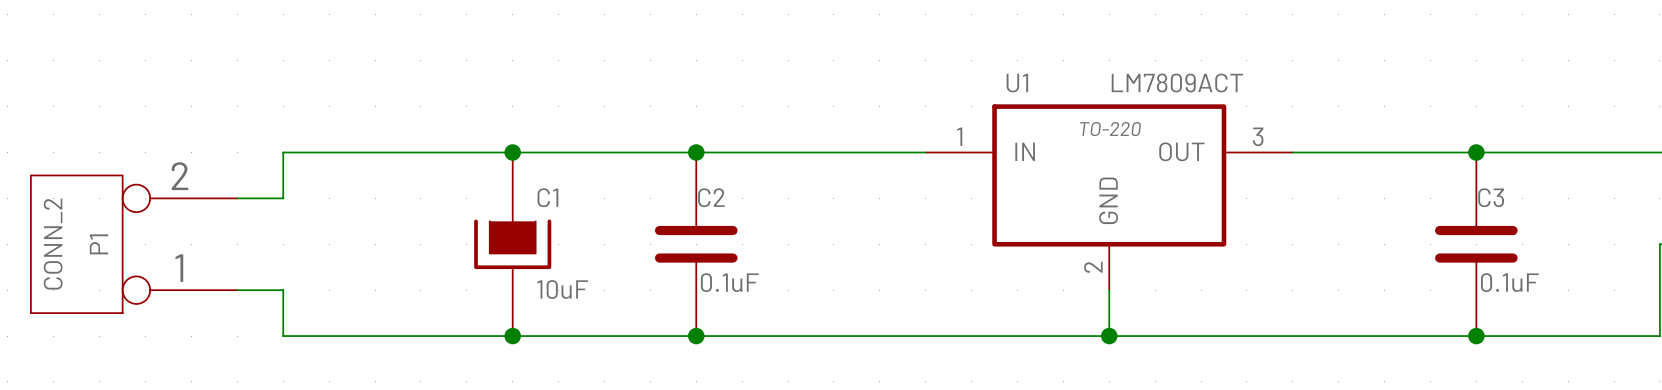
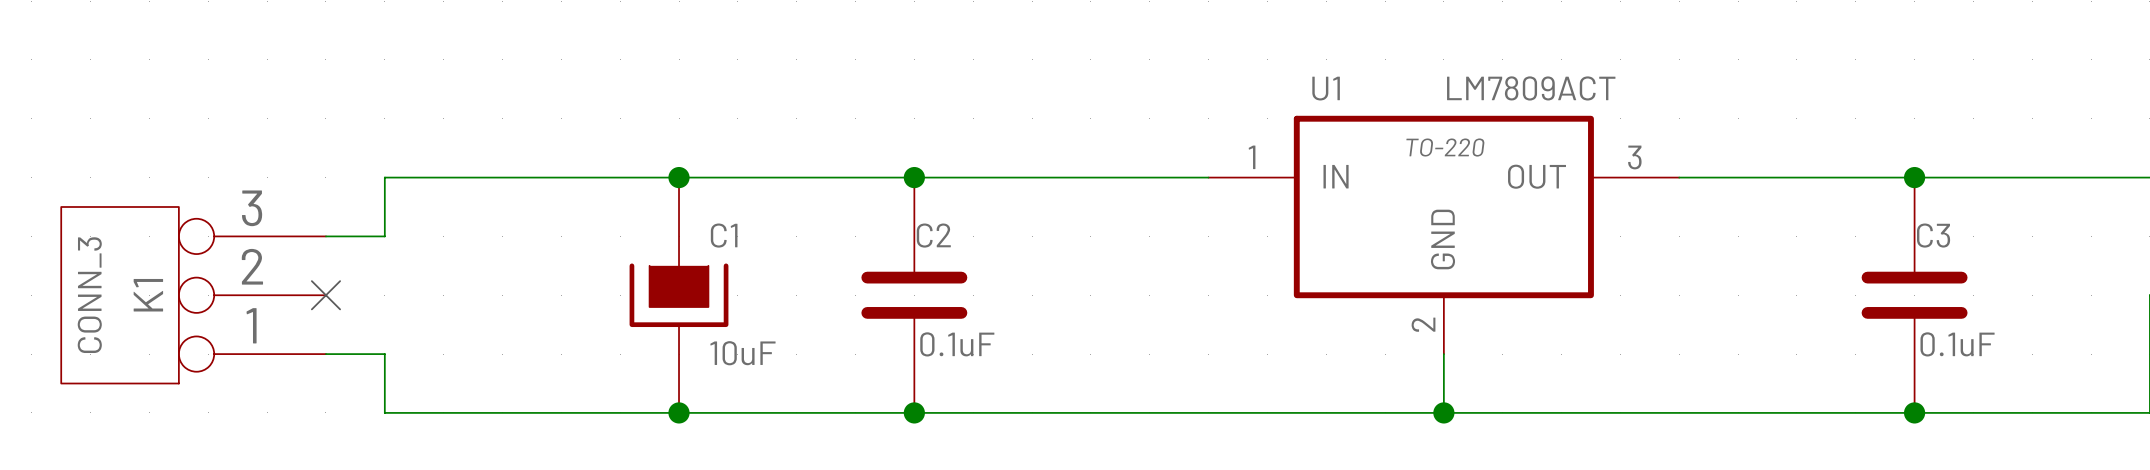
P1: CONN_2 (134, 244) -> none
K1: none -> CONN_3 (193, 295)
no-connect mark: none -> (325, 295)

